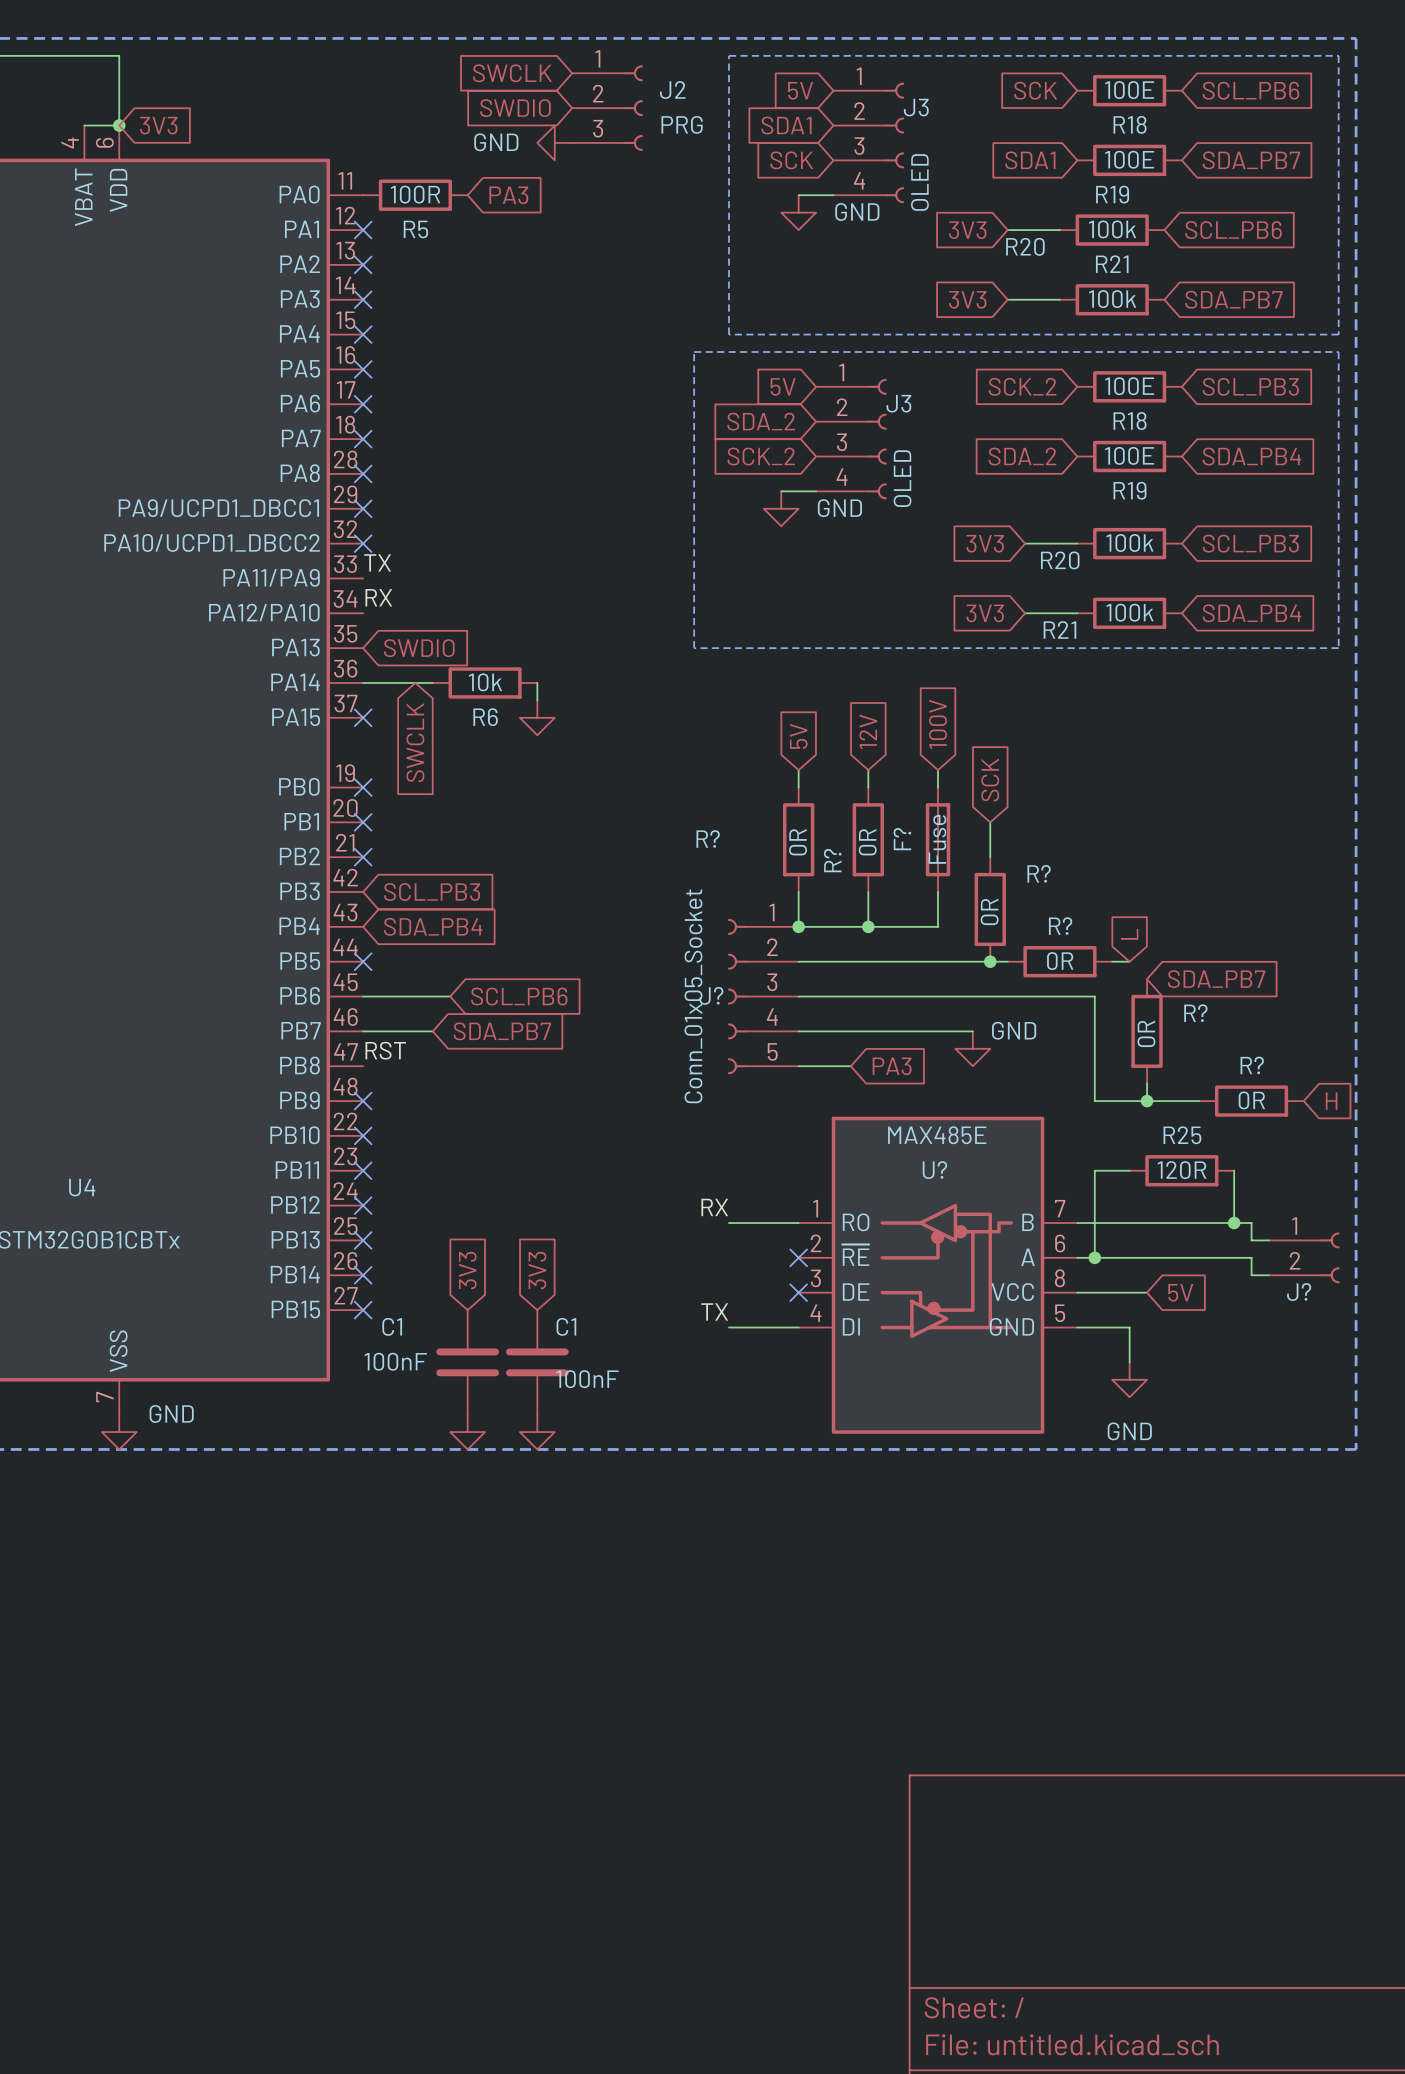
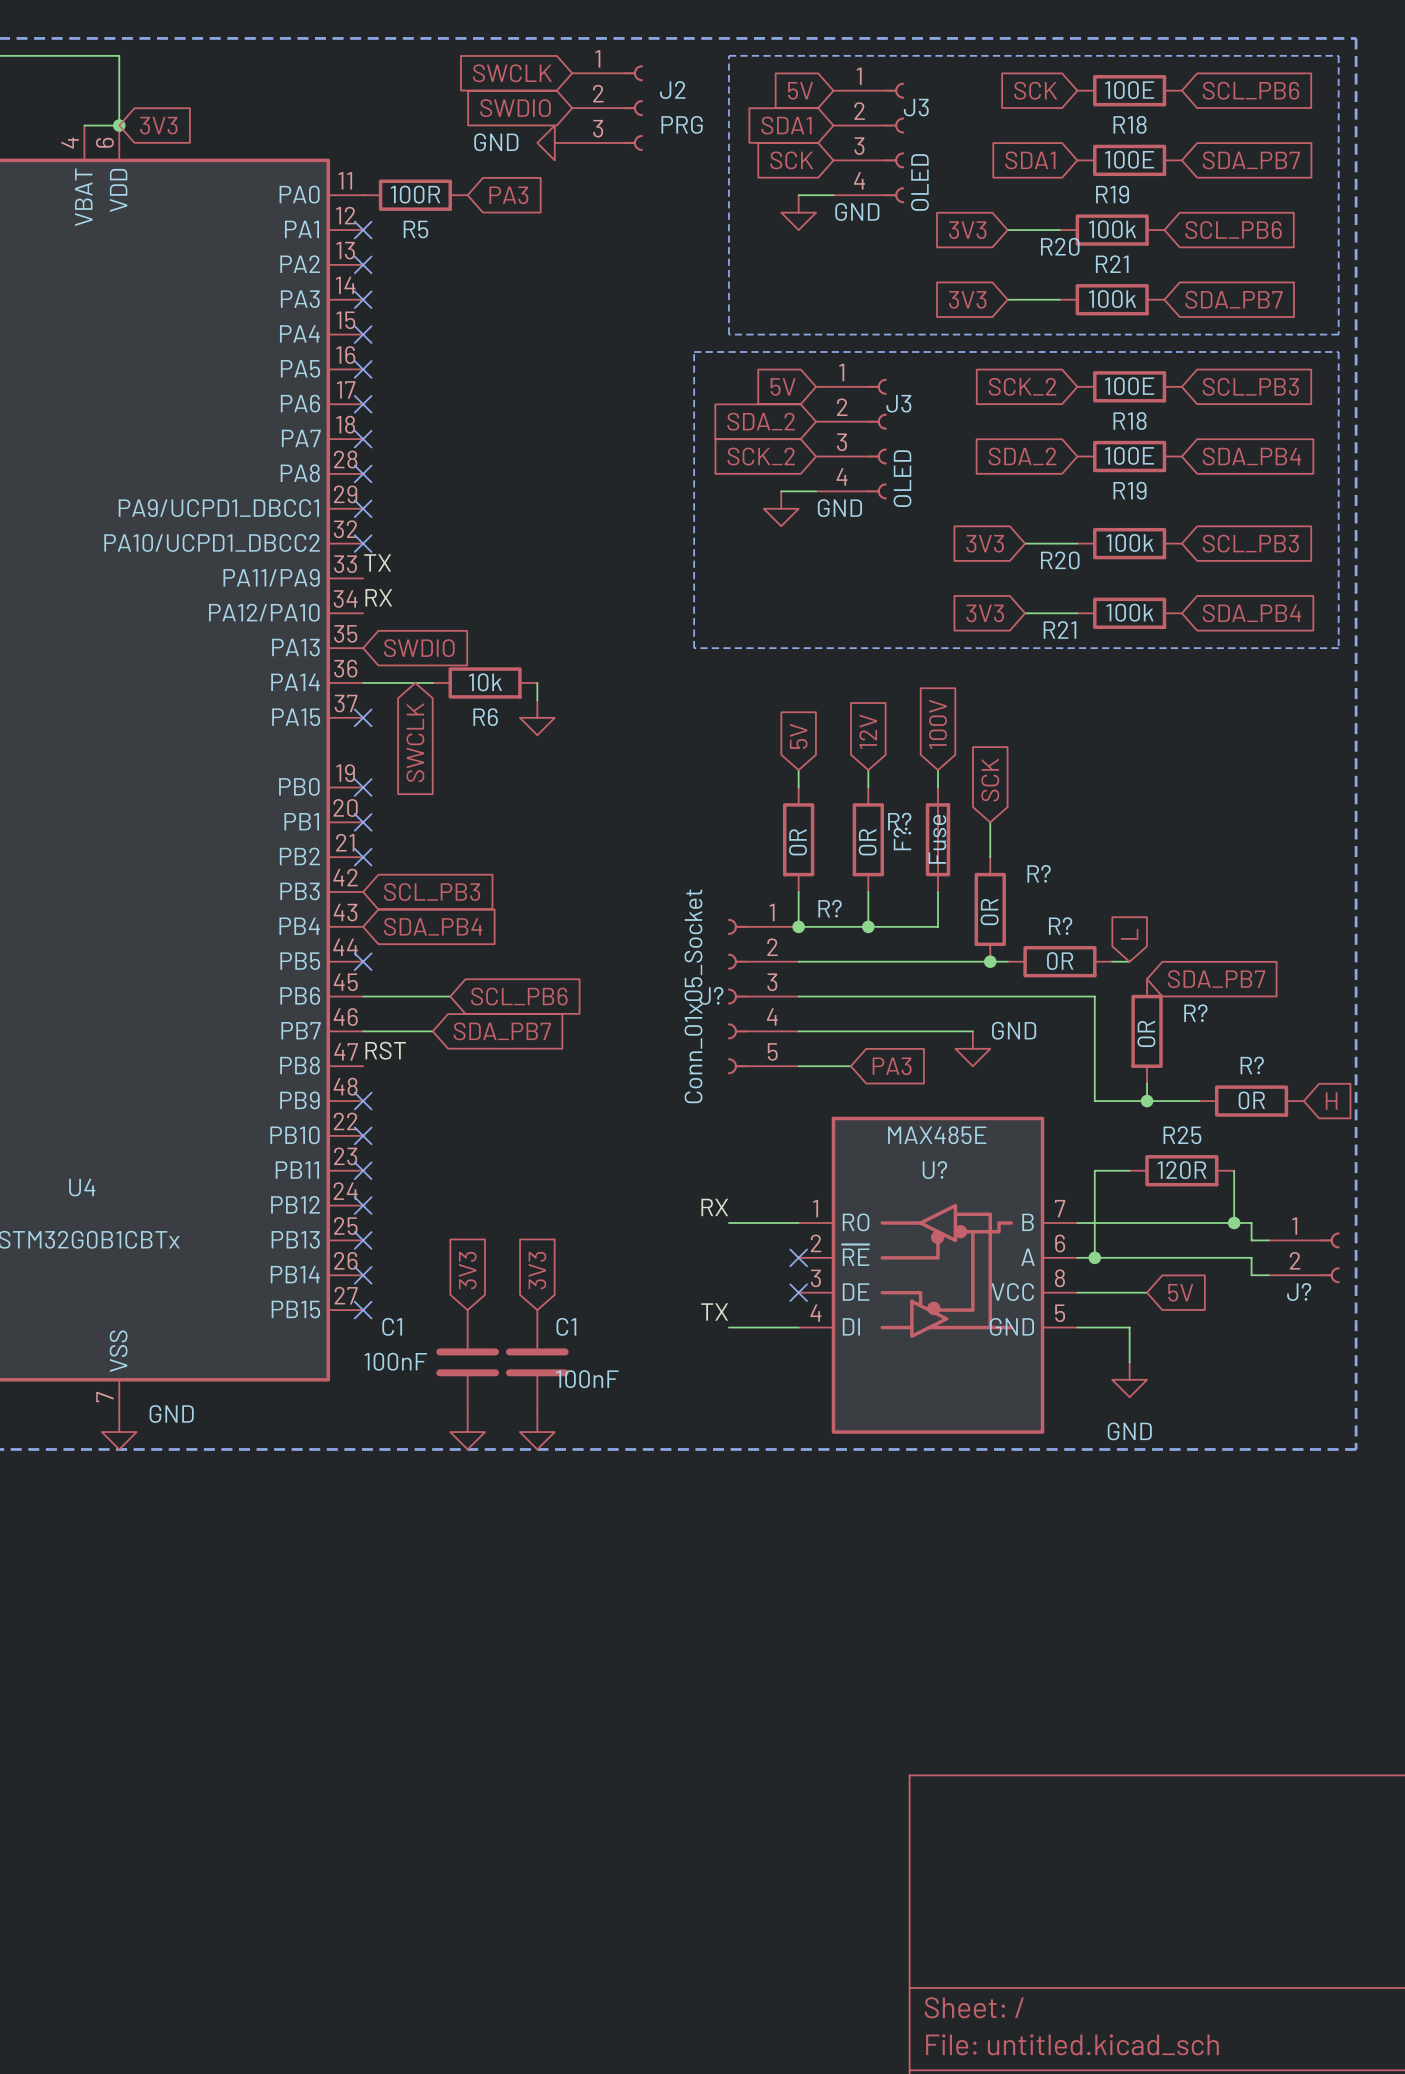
R20 name position: R20 (1025, 246) -> R20 (1060, 246)
R? name position: R? (708, 839) -> R? (830, 908)
R? name rotation: 0° (832, 860) -> 90° clockwise (899, 821)
R? name position: R? (832, 860) -> R? (899, 821)

